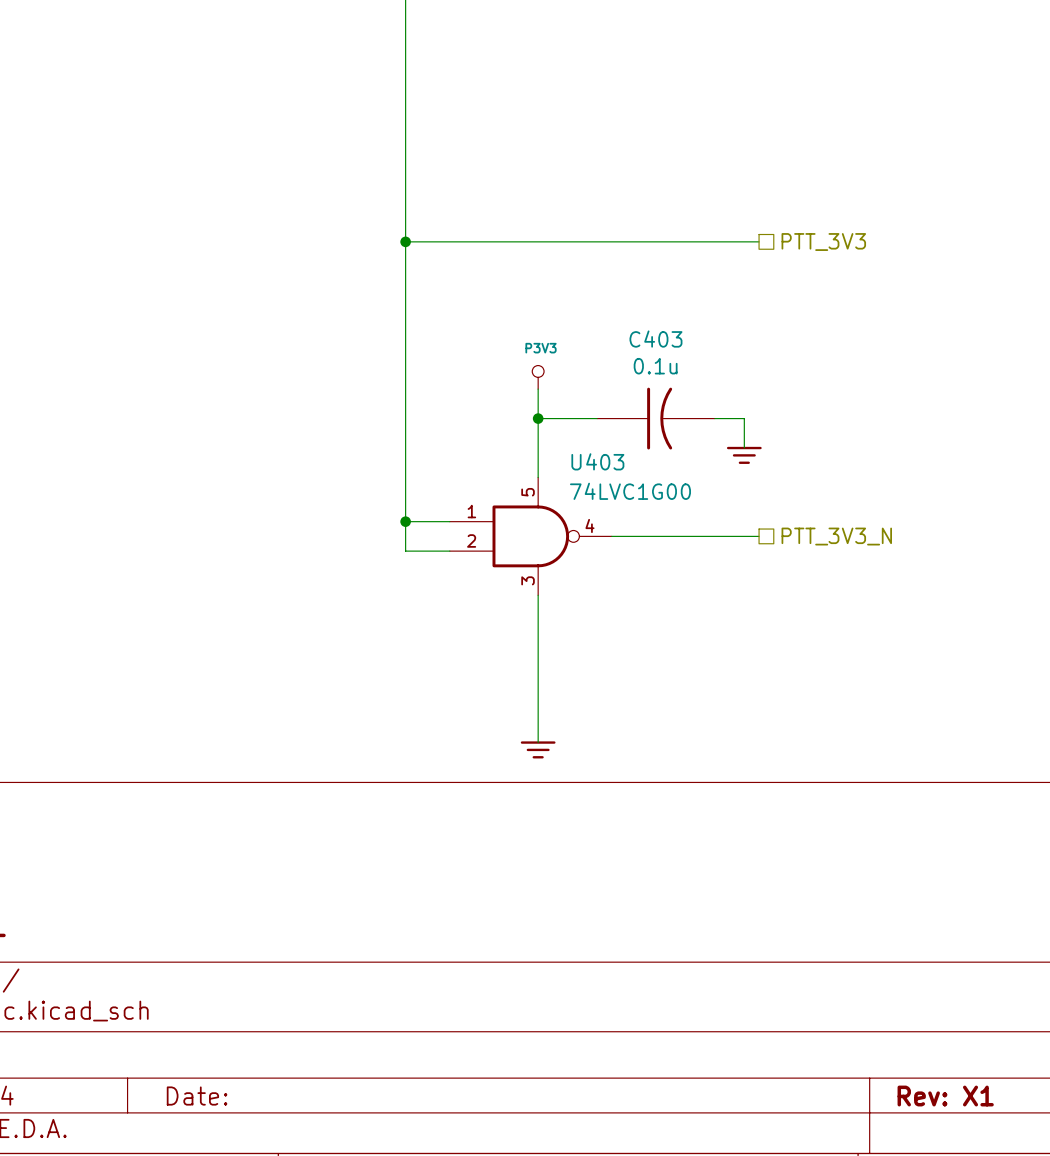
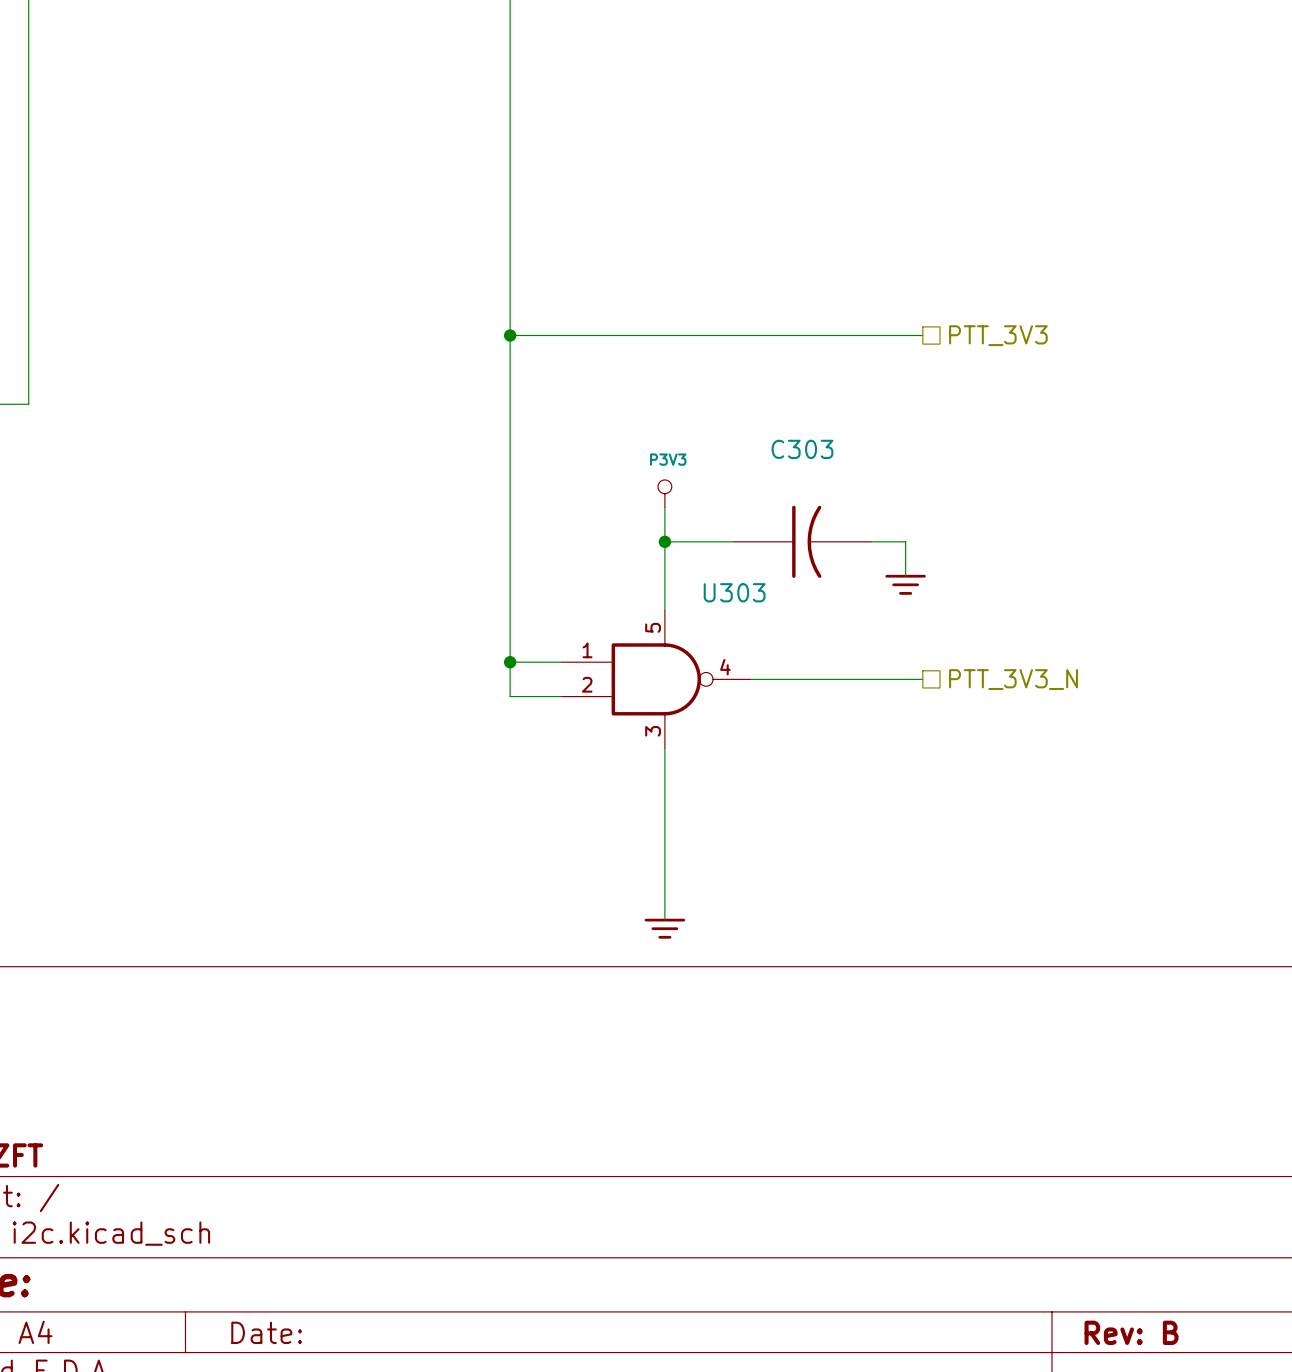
C403 name: C403 (655, 339) -> C303 (802, 449)
C403 value: 0.1u (655, 366) -> none
U403 name: U403 (597, 461) -> U303 (734, 592)
U403 value: 74LVC1G00 (630, 491) -> none
title block: Rev: X1 (945, 1096) -> Rev: B (1131, 1332)

